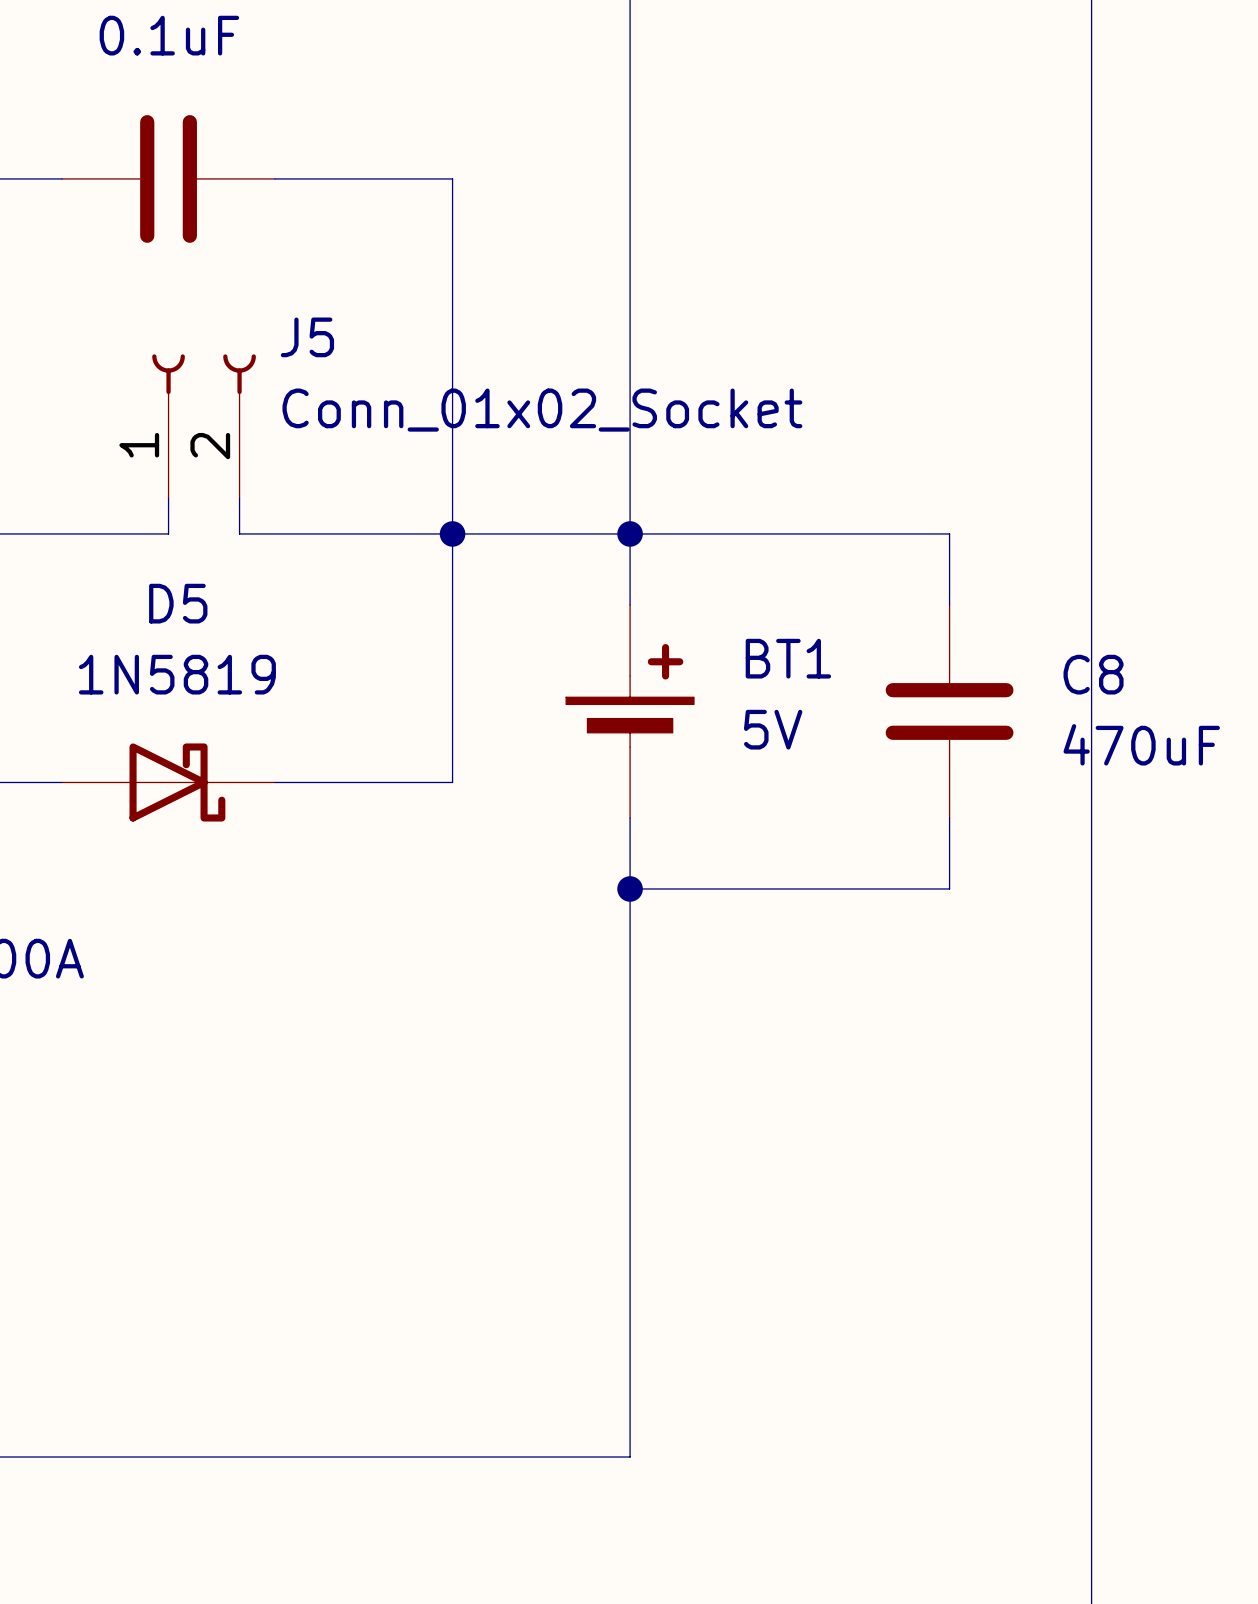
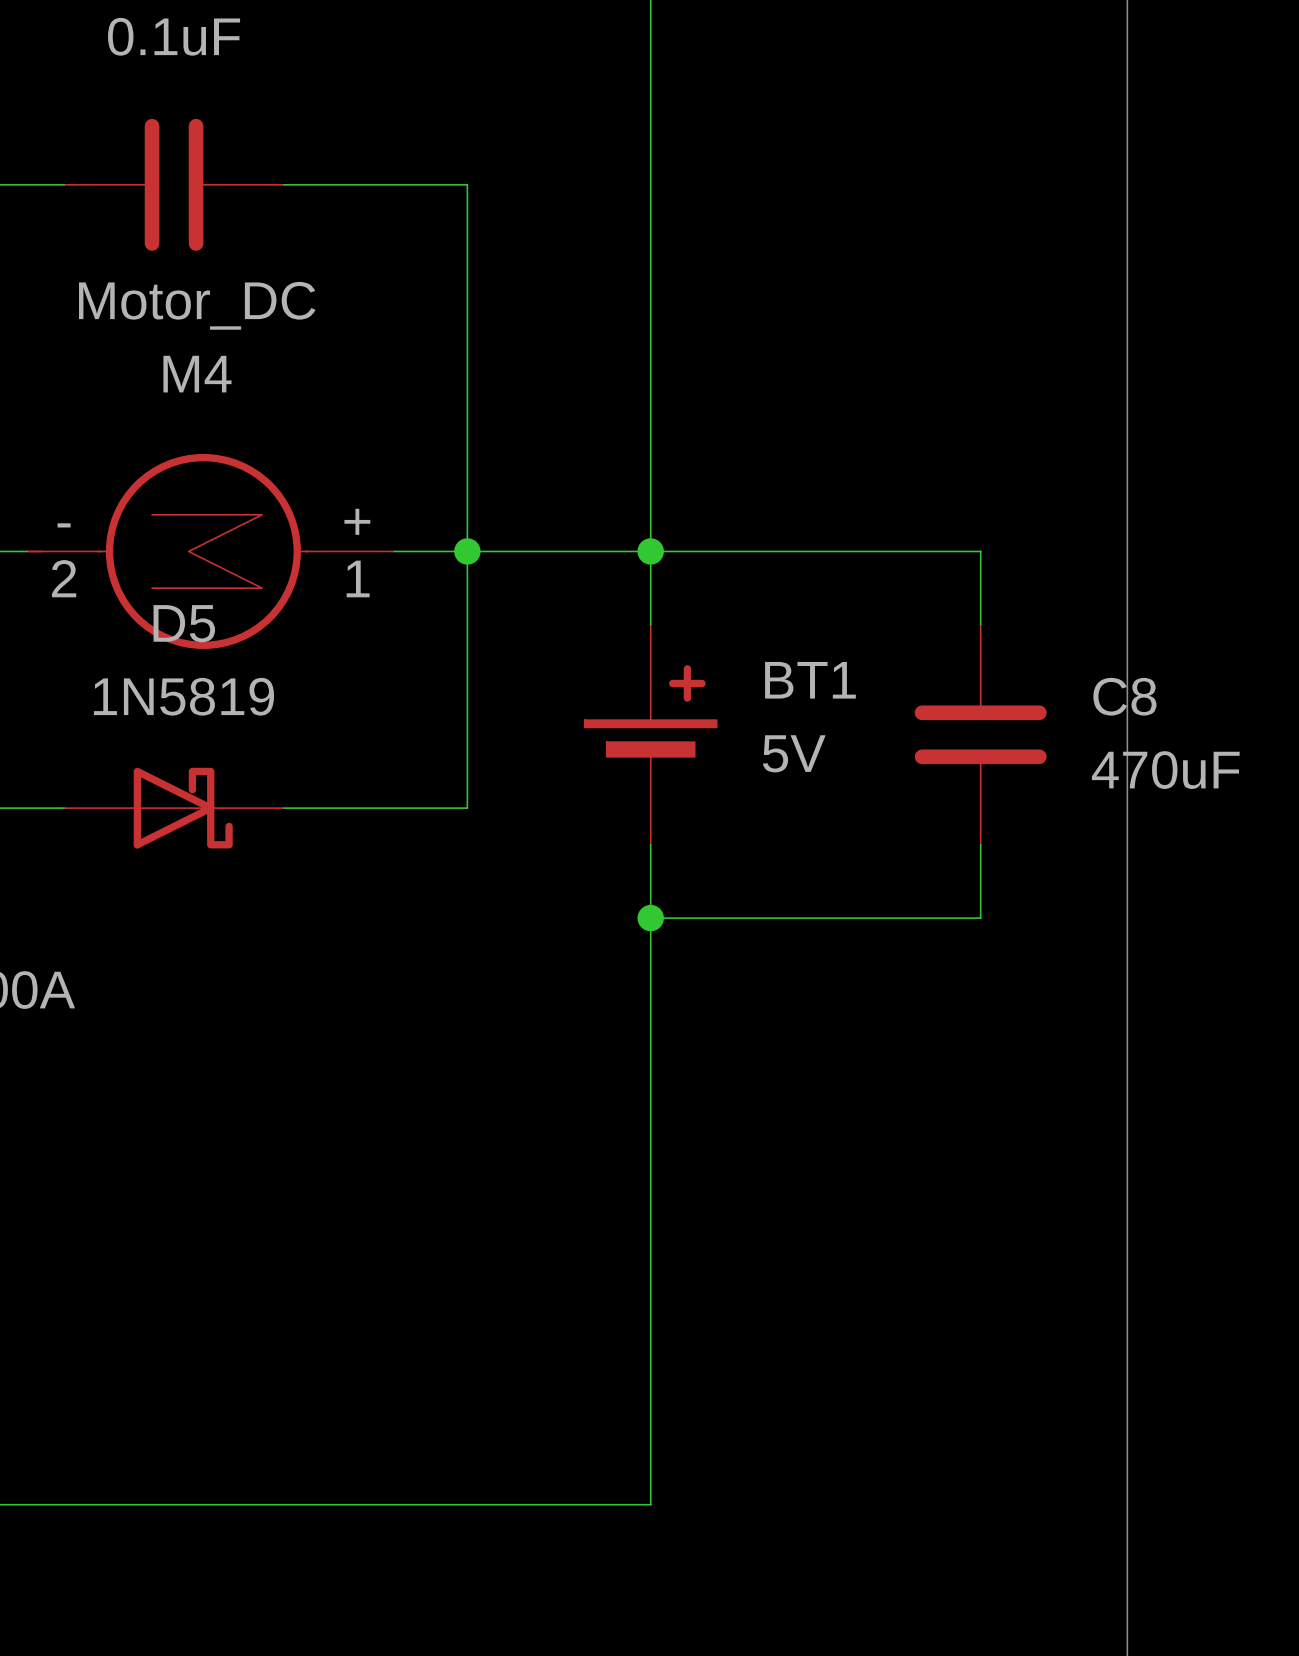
J5: Conn_01x02_Socket (204, 426) -> none
wire: (168, 498) (168, 533) (26, 533) -> none
wire: (239, 498) (239, 533) (381, 533) -> none
M4: none -> Motor_DC (210, 551)

